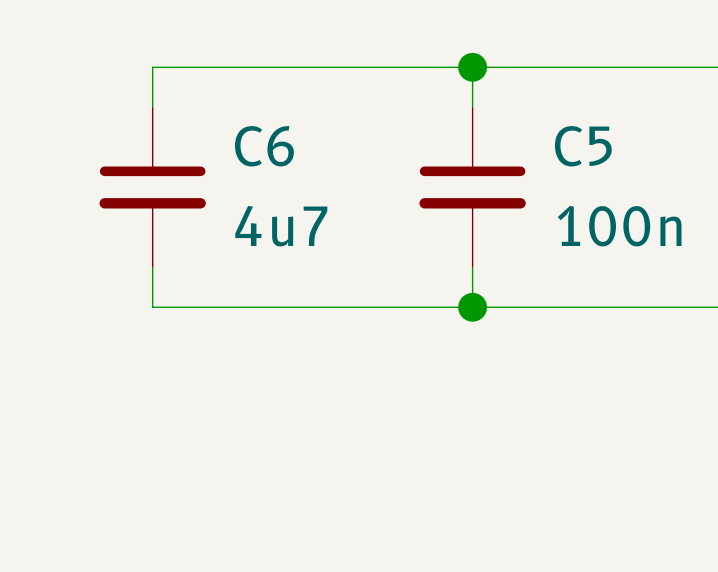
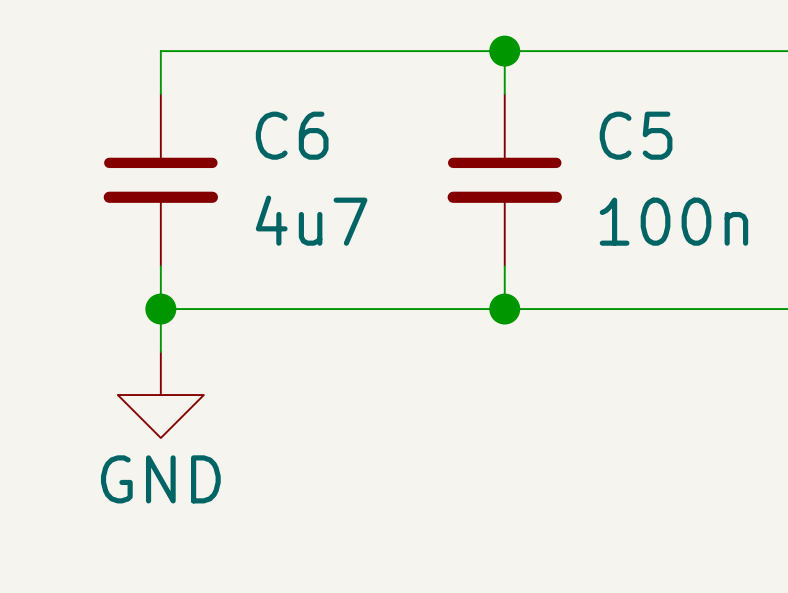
wire: none -> (160, 309) (160, 352)
junction: none -> (160, 309)
power symbol: none -> GND (160, 395)

